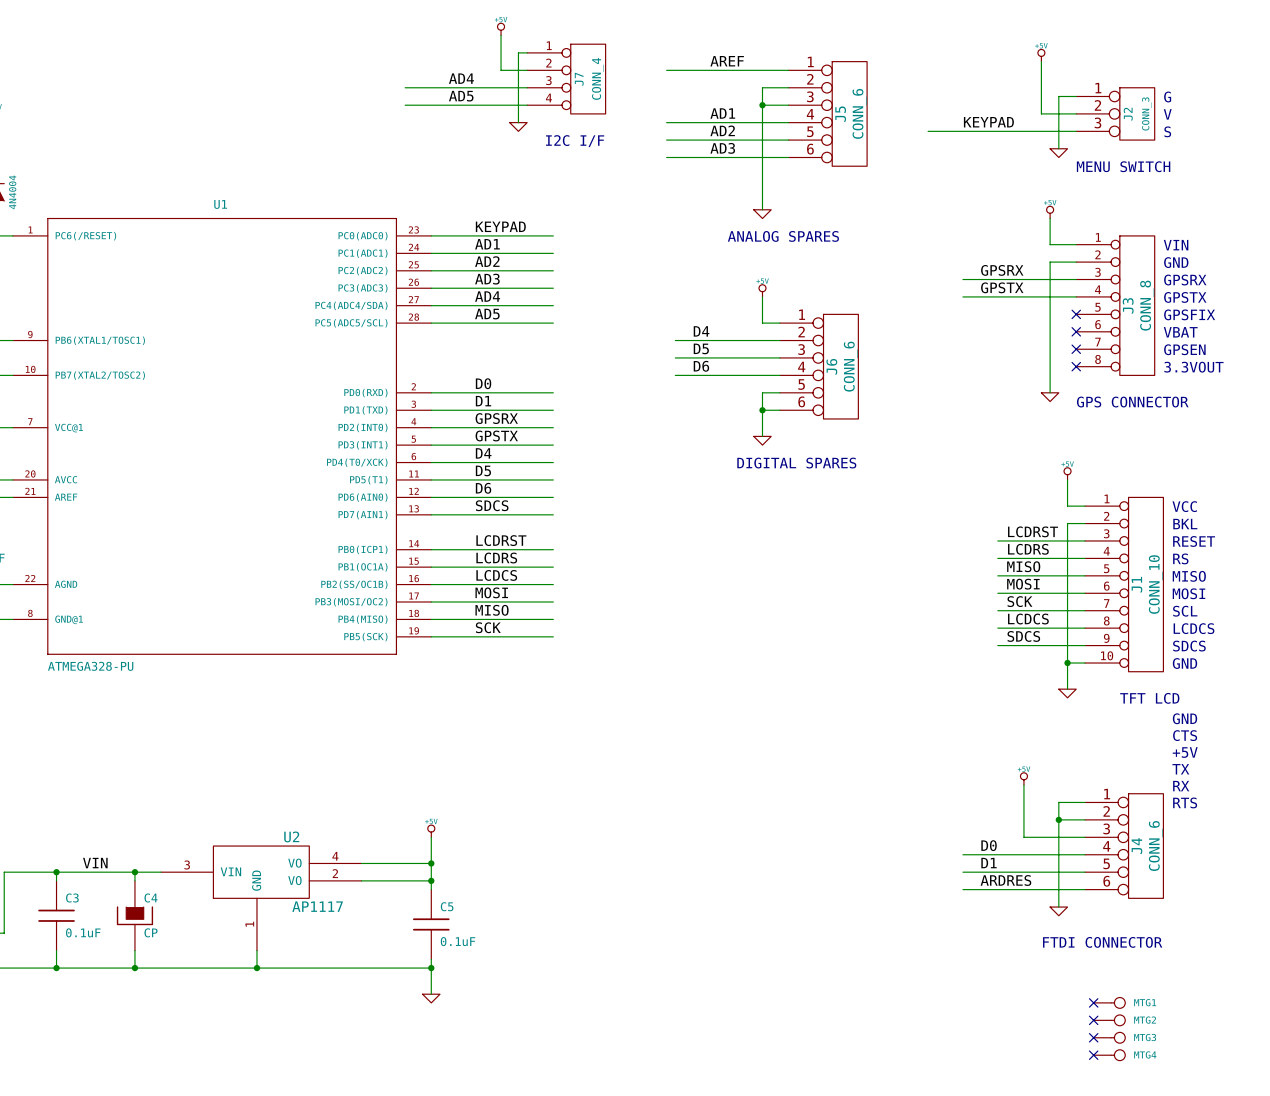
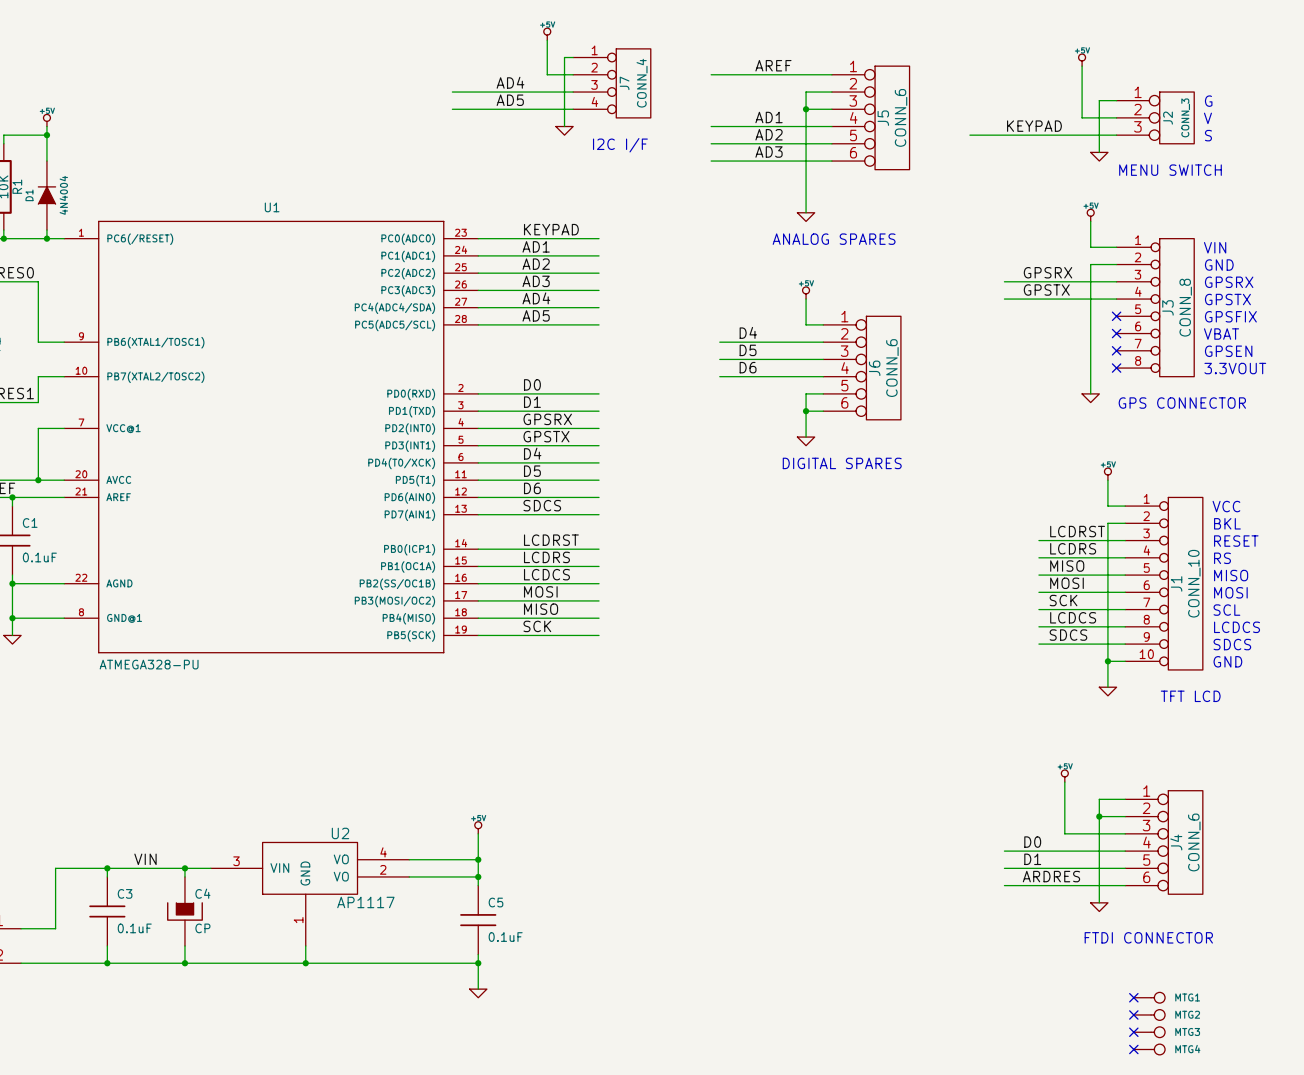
text: GND (1184, 718) -> none
text: CTS (1185, 735) -> none
text: +5V (1185, 752) -> none
text: TX (1180, 769) -> none
text: RX (1181, 786) -> none
text: RTS (1185, 802) -> none

